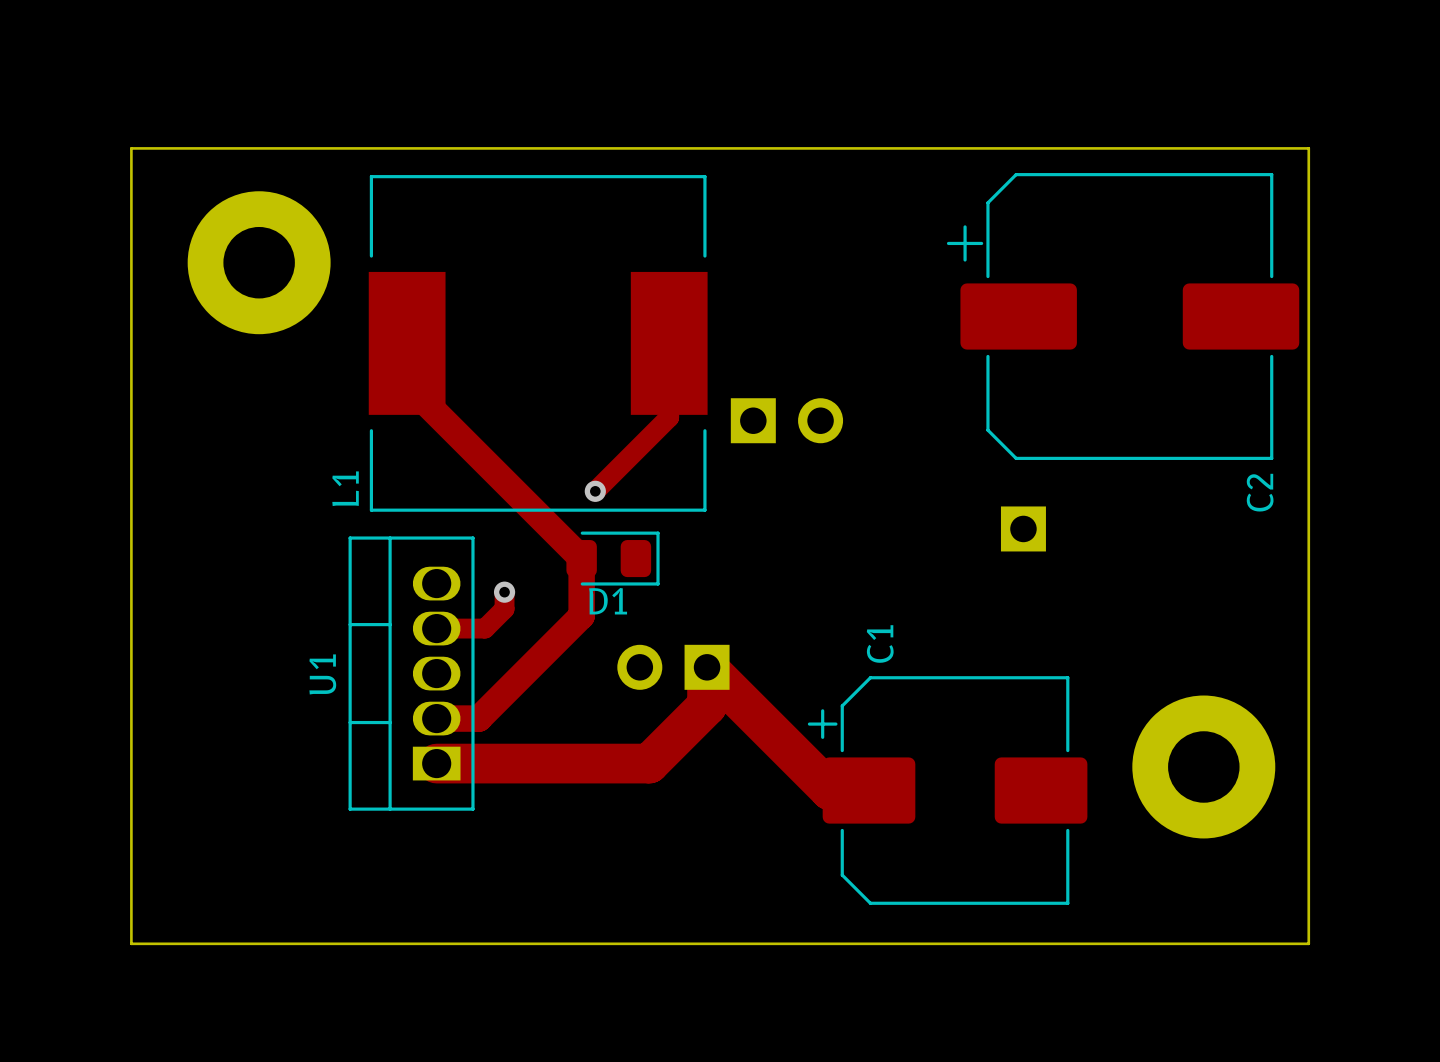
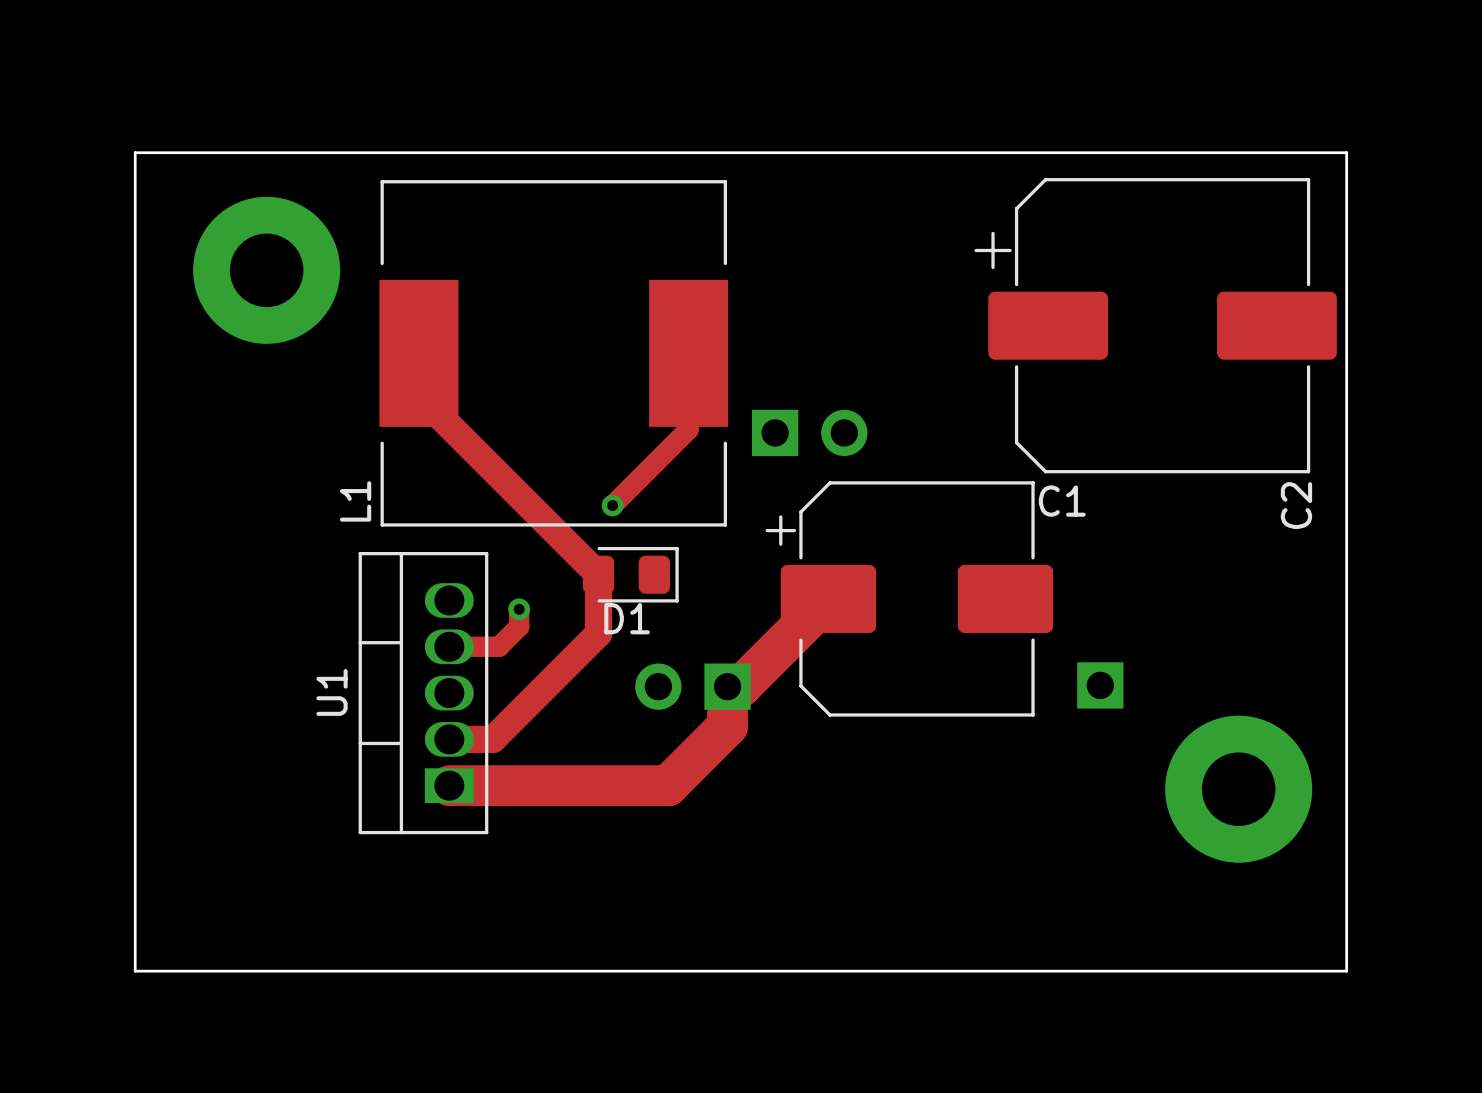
part position: (1023, 528) -> (1100, 685)
C1 name rotation: 0° (880, 644) -> 90° clockwise (1062, 501)
C1 name position: C1 (880, 644) -> C1 (1062, 501)
track: (707, 667) (830, 790) (869, 790) -> (727, 686) (740, 686) (828, 598)
C1 position: (947, 790) -> (909, 598)

